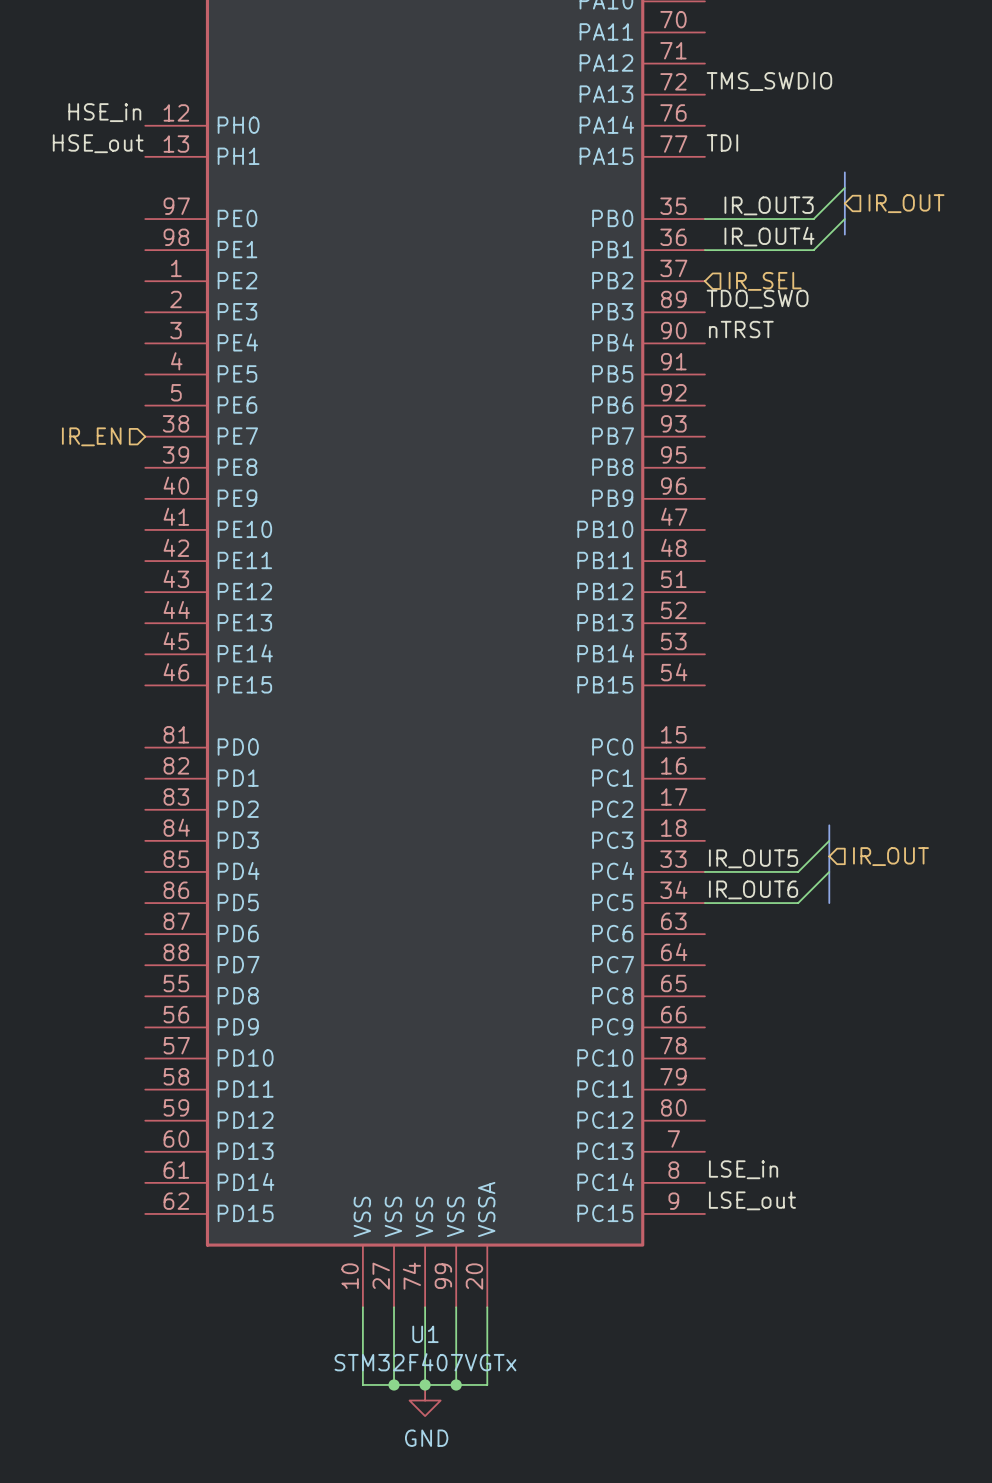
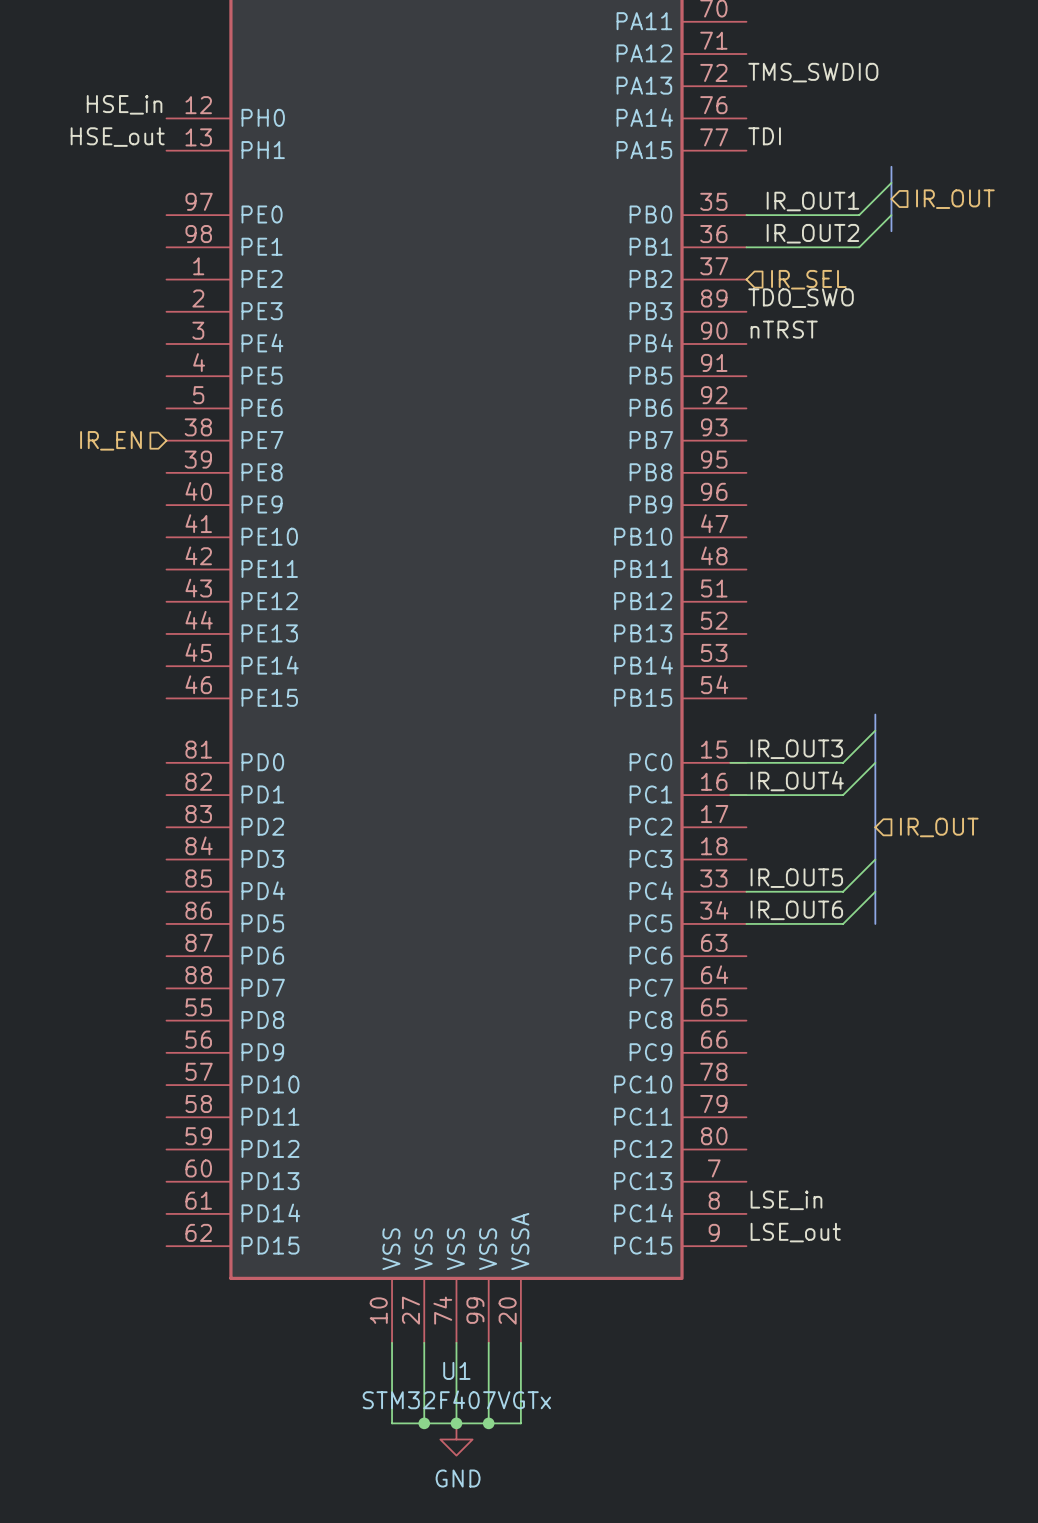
label: IR_OUT3 (769, 205) -> IR_OUT1 (812, 201)
label: IR_OUT4 (769, 236) -> IR_OUT2 (812, 233)
bus: none -> (875, 714) (875, 843)
wire: none -> (875, 730) (843, 762) (730, 762)
label: none -> IR_OUT3 (796, 749)
wire: none -> (875, 762) (843, 795) (730, 795)
label: none -> IR_OUT4 (797, 781)
hierarchical label position: IR_OUT (890, 856) -> IR_OUT (939, 827)

